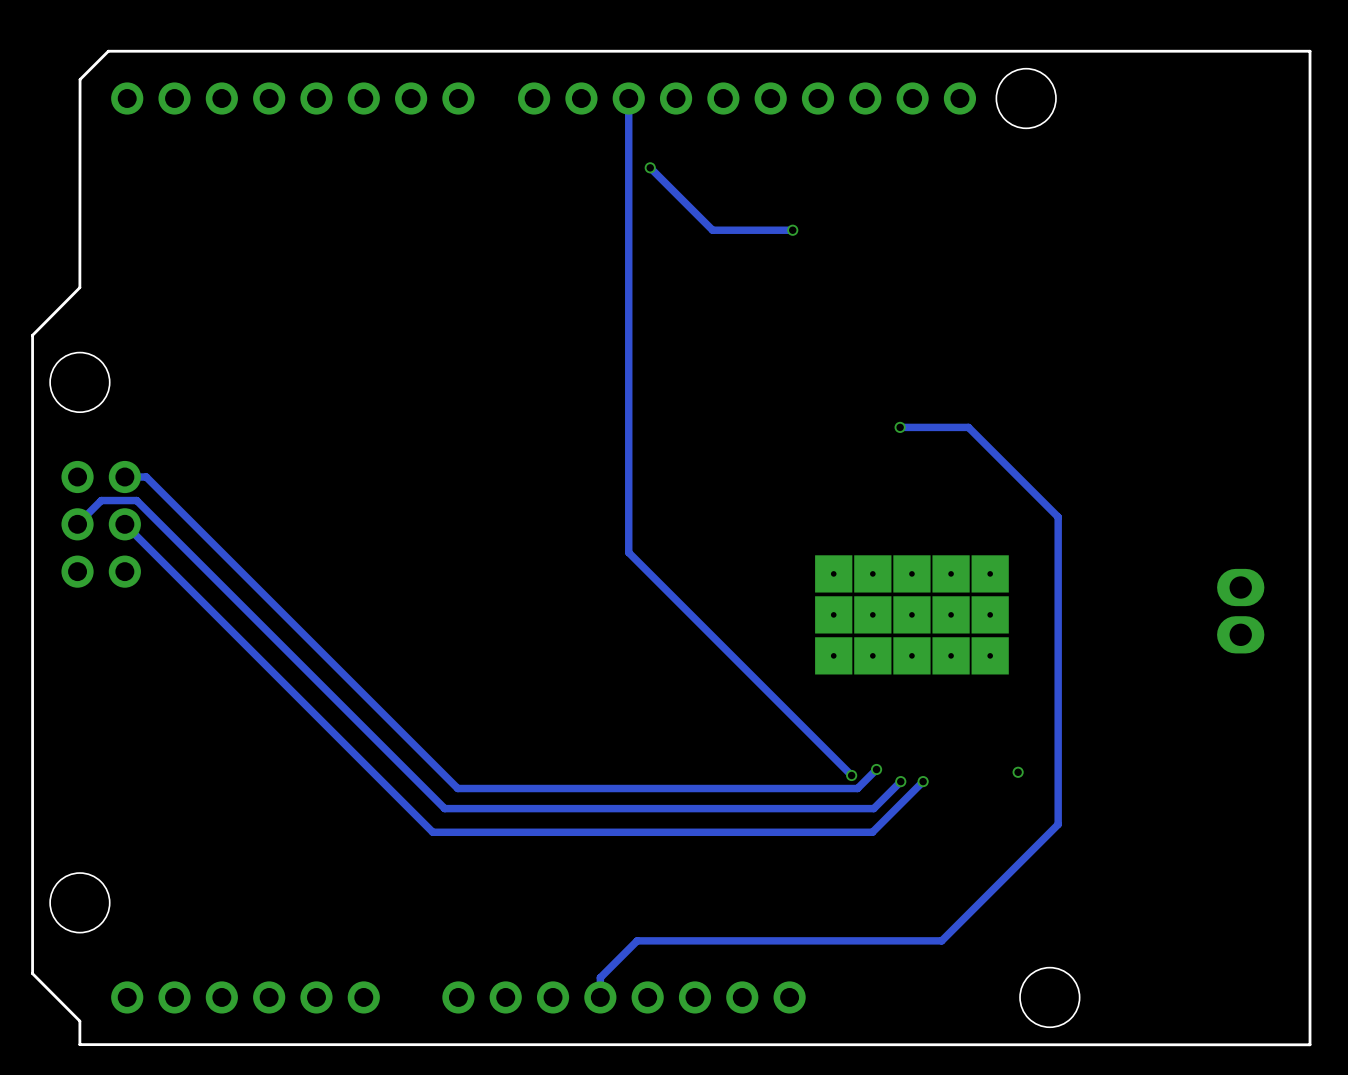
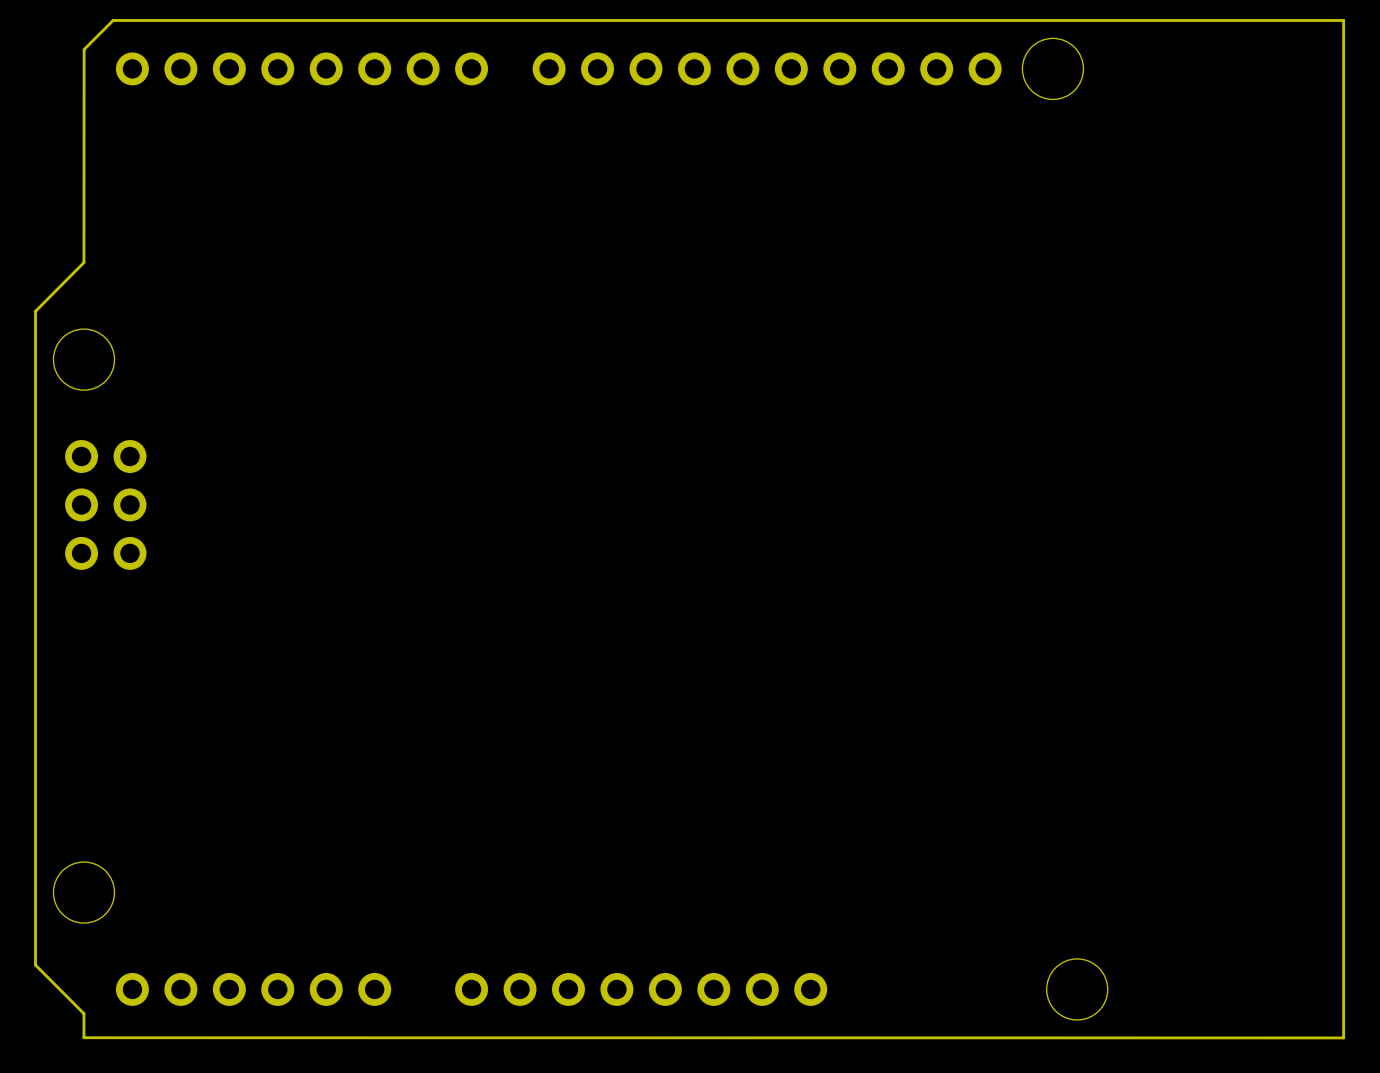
track: (628, 98) (628, 552) (851, 775) -> none
track: (650, 167) (712, 230) (792, 230) -> none
via: (650, 167) -> none
via: (792, 230) -> none
track: (900, 427) (968, 427) (1058, 517) (1058, 824) (941, 940) (637, 940) (600, 977) (600, 997) -> none
via: (900, 427) -> none
track: (124, 477) (146, 477) (457, 788) (857, 788) (876, 769) -> none
track: (77, 524) (101, 500) (136, 500) (444, 808) (873, 808) (900, 781) -> none
track: (124, 524) (432, 832) (872, 832) (923, 781) -> none
part: (1240, 611) -> none
part: (911, 614) -> none
via: (876, 769) -> none
via: (1018, 772) -> none
via: (851, 775) -> none
via: (900, 781) -> none
via: (923, 781) -> none

